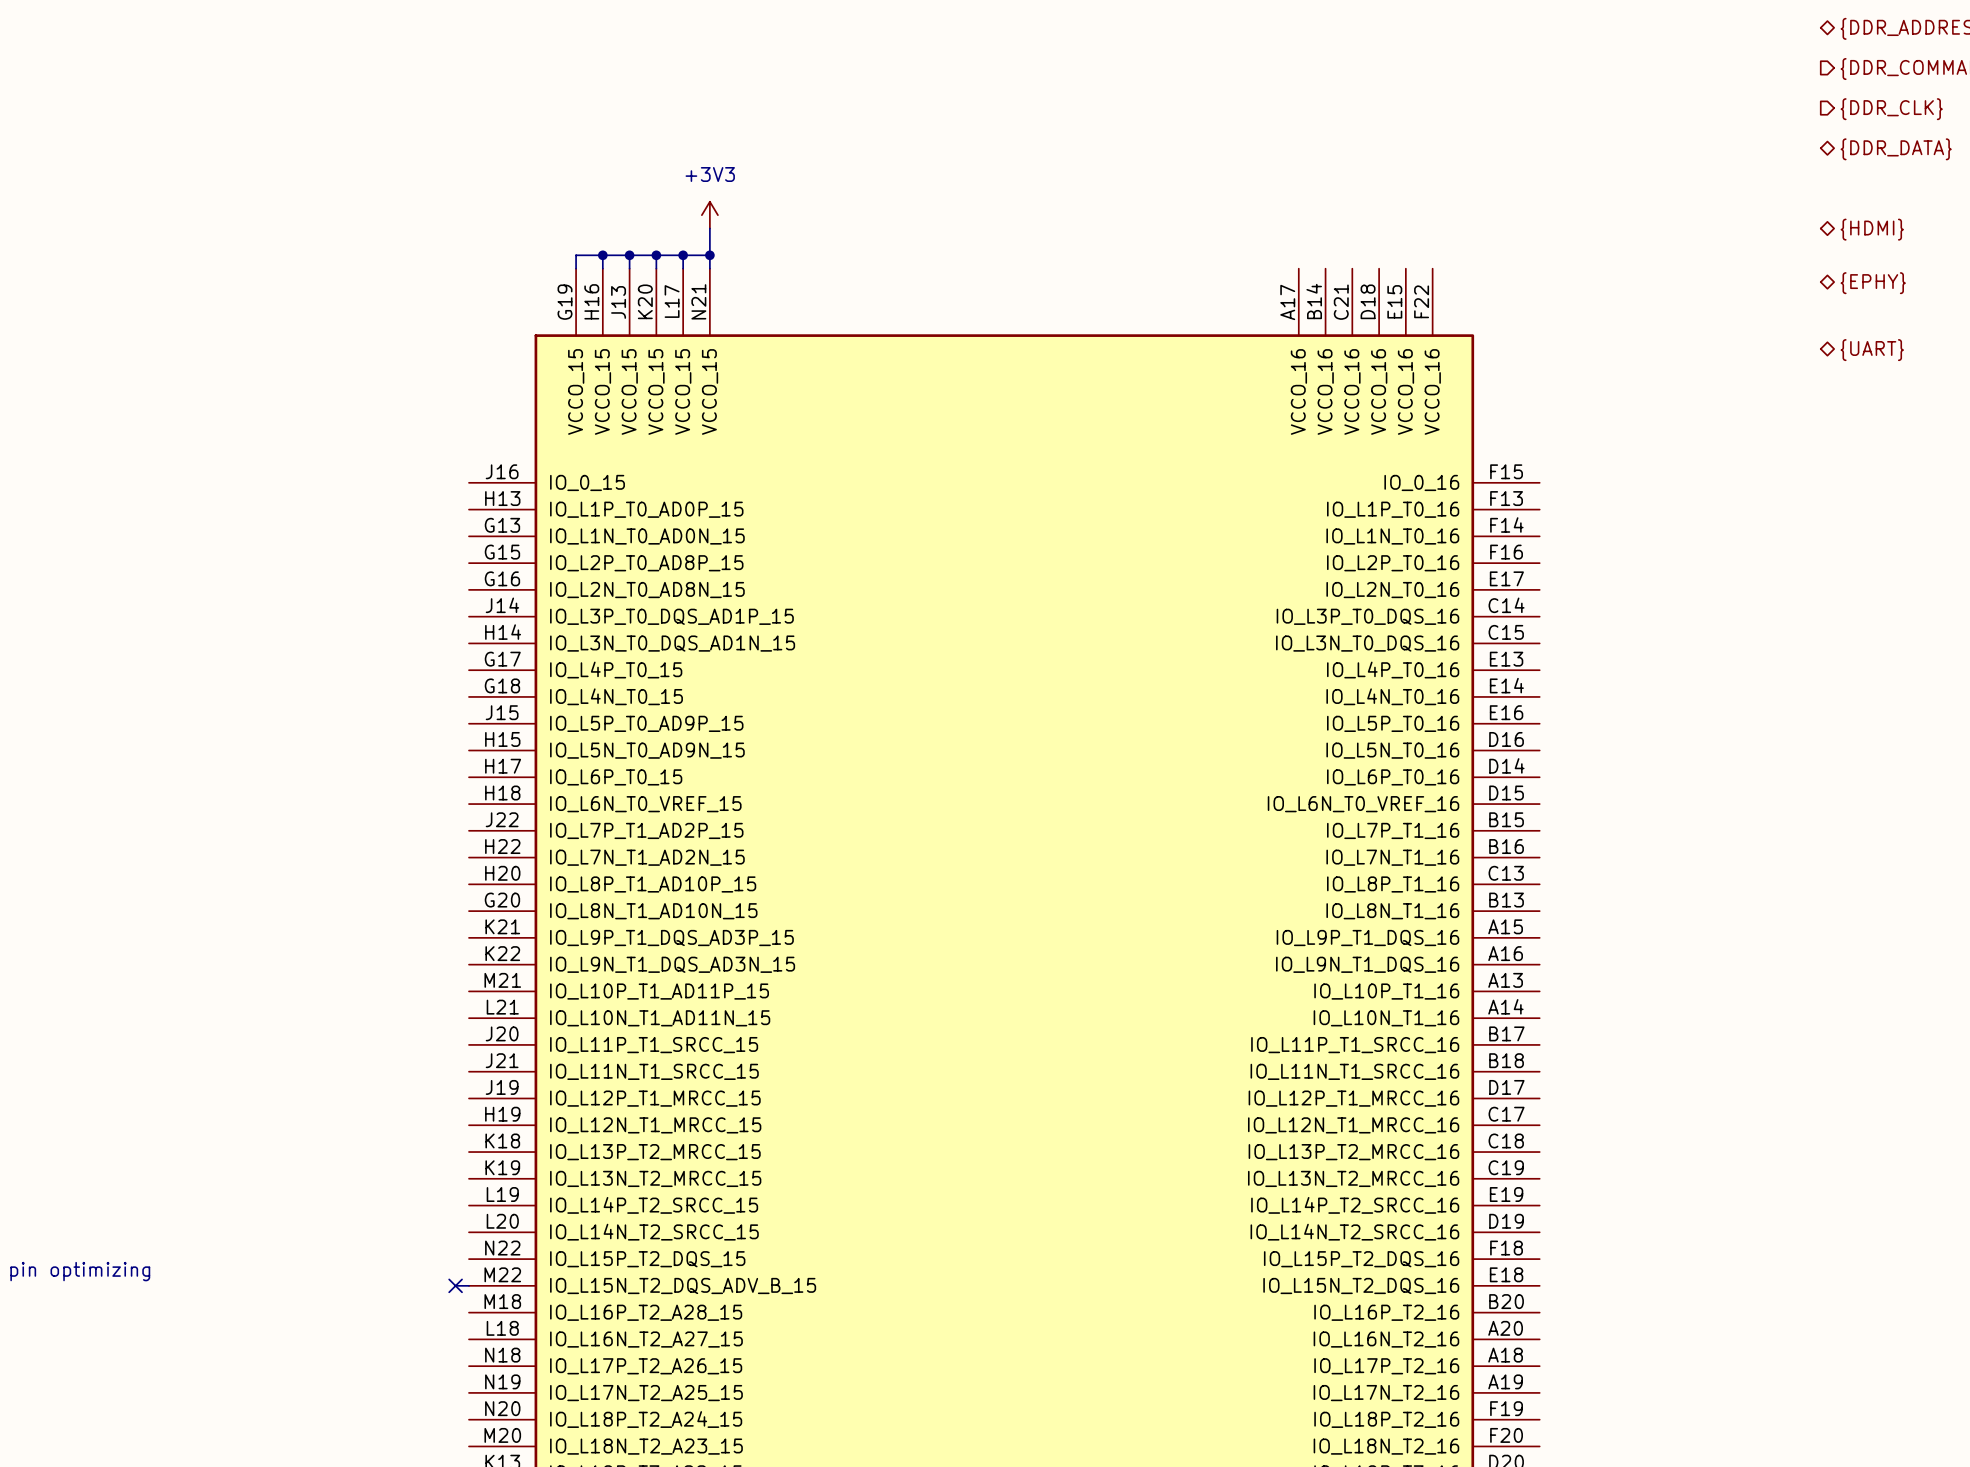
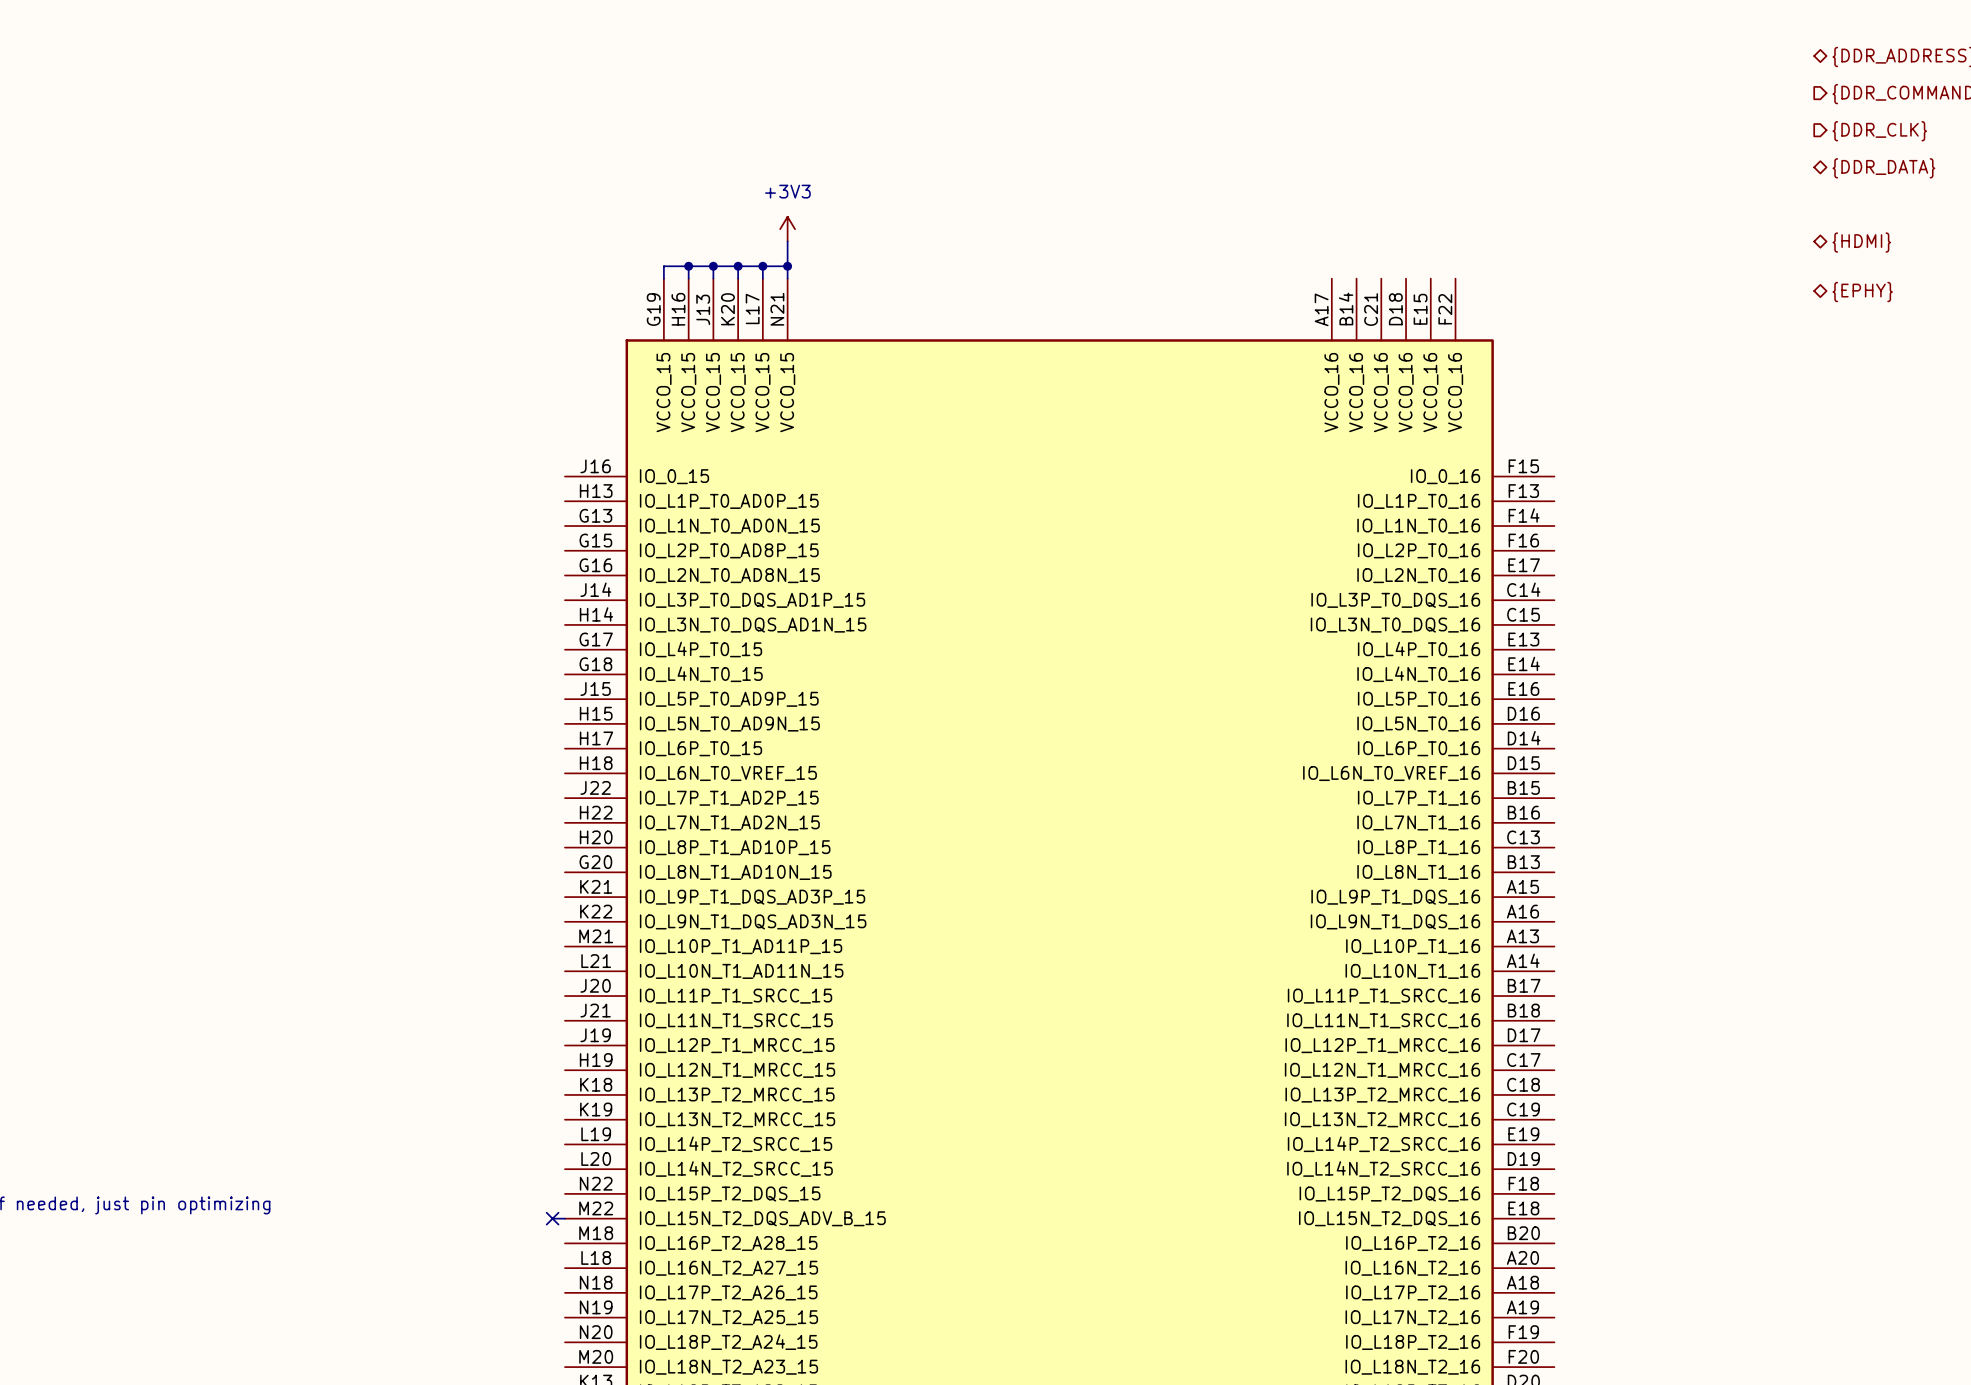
hierarchical label: {UART} (1872, 350) -> none

